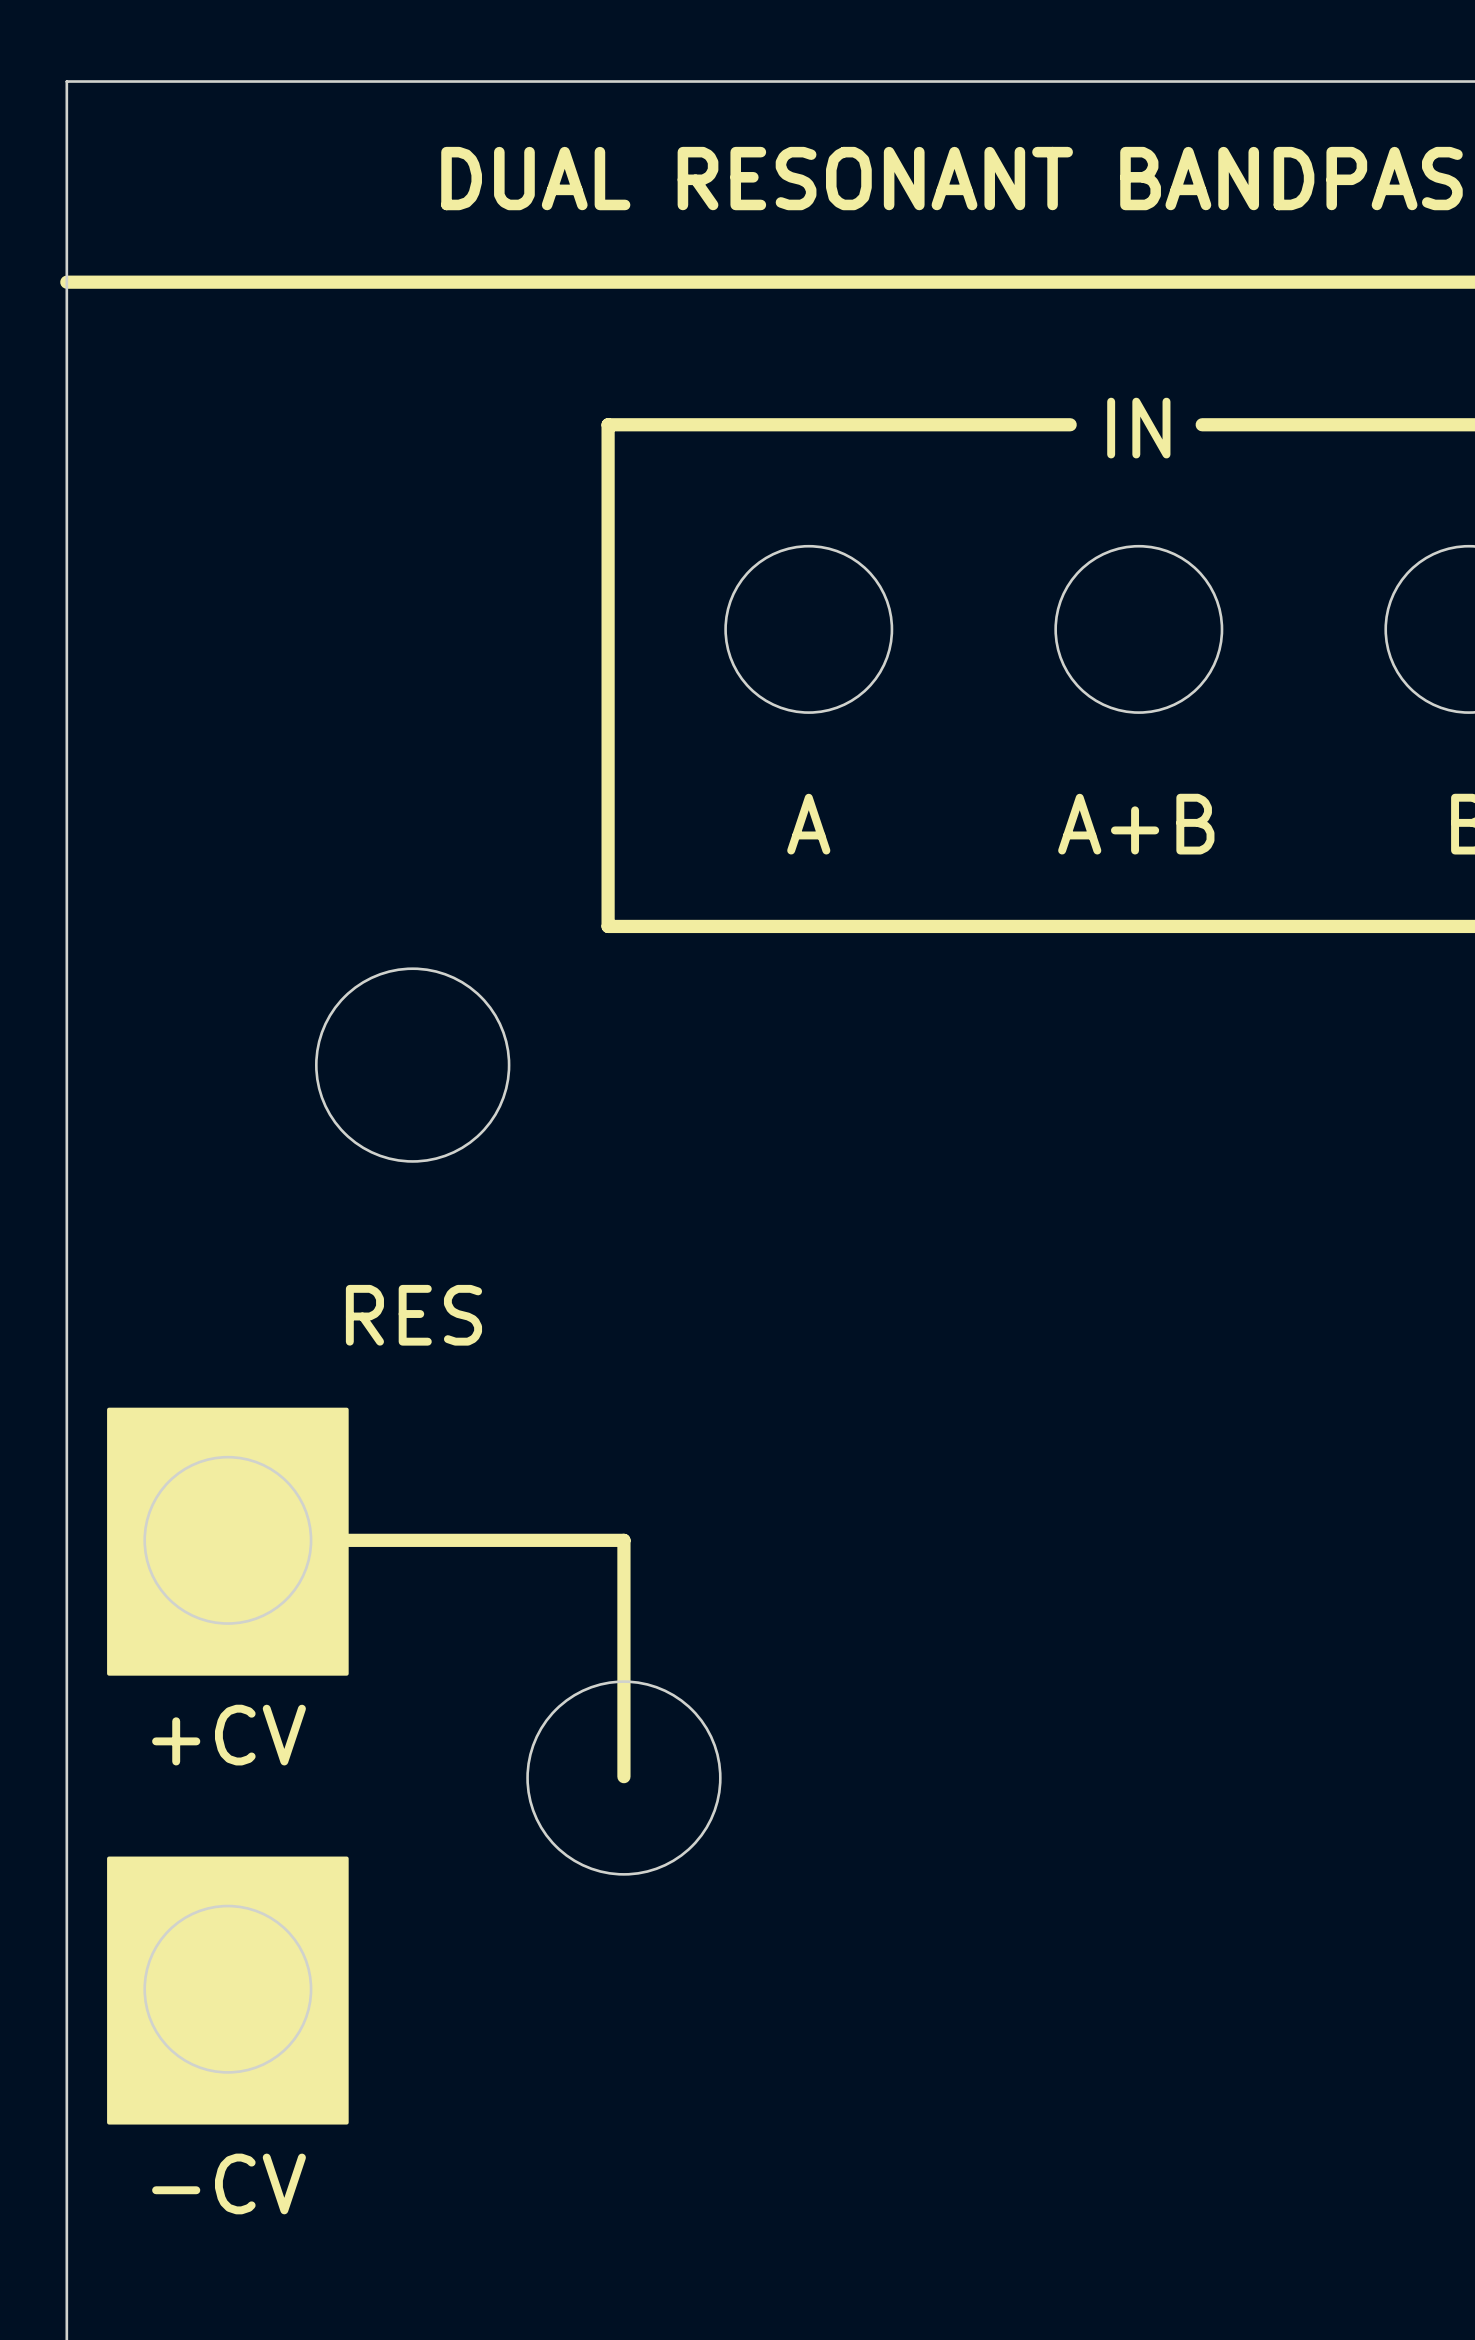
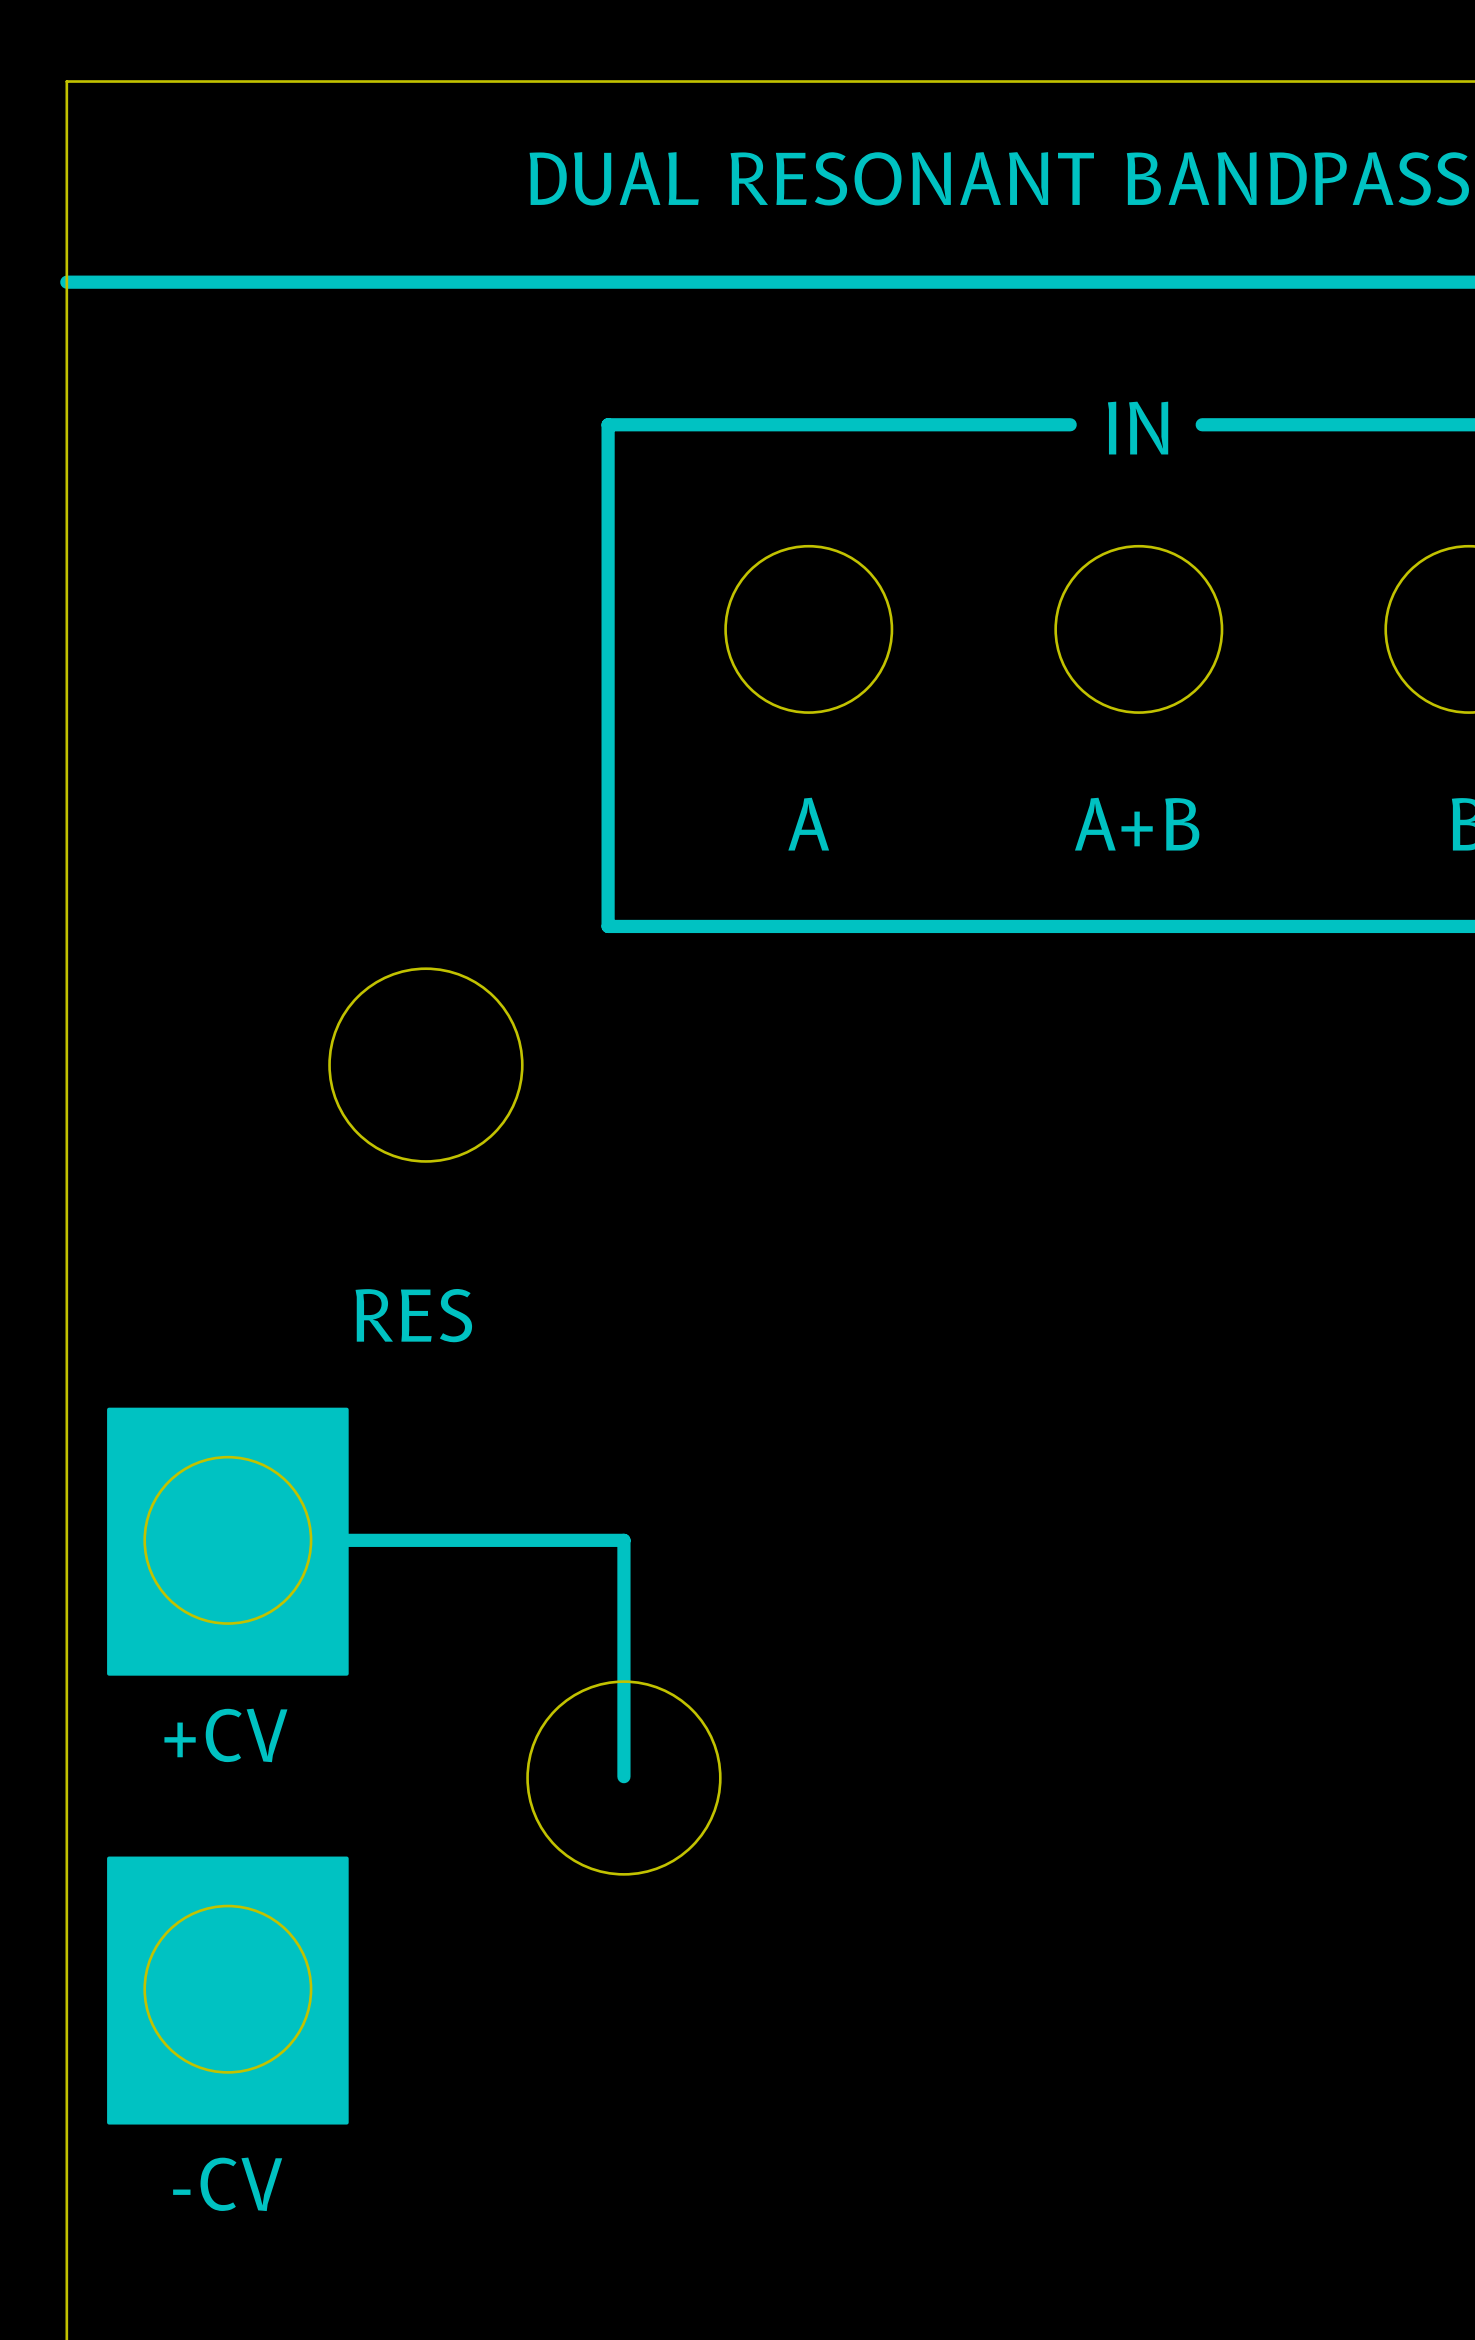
round board edge position: (412, 1065) -> (425, 1065)

